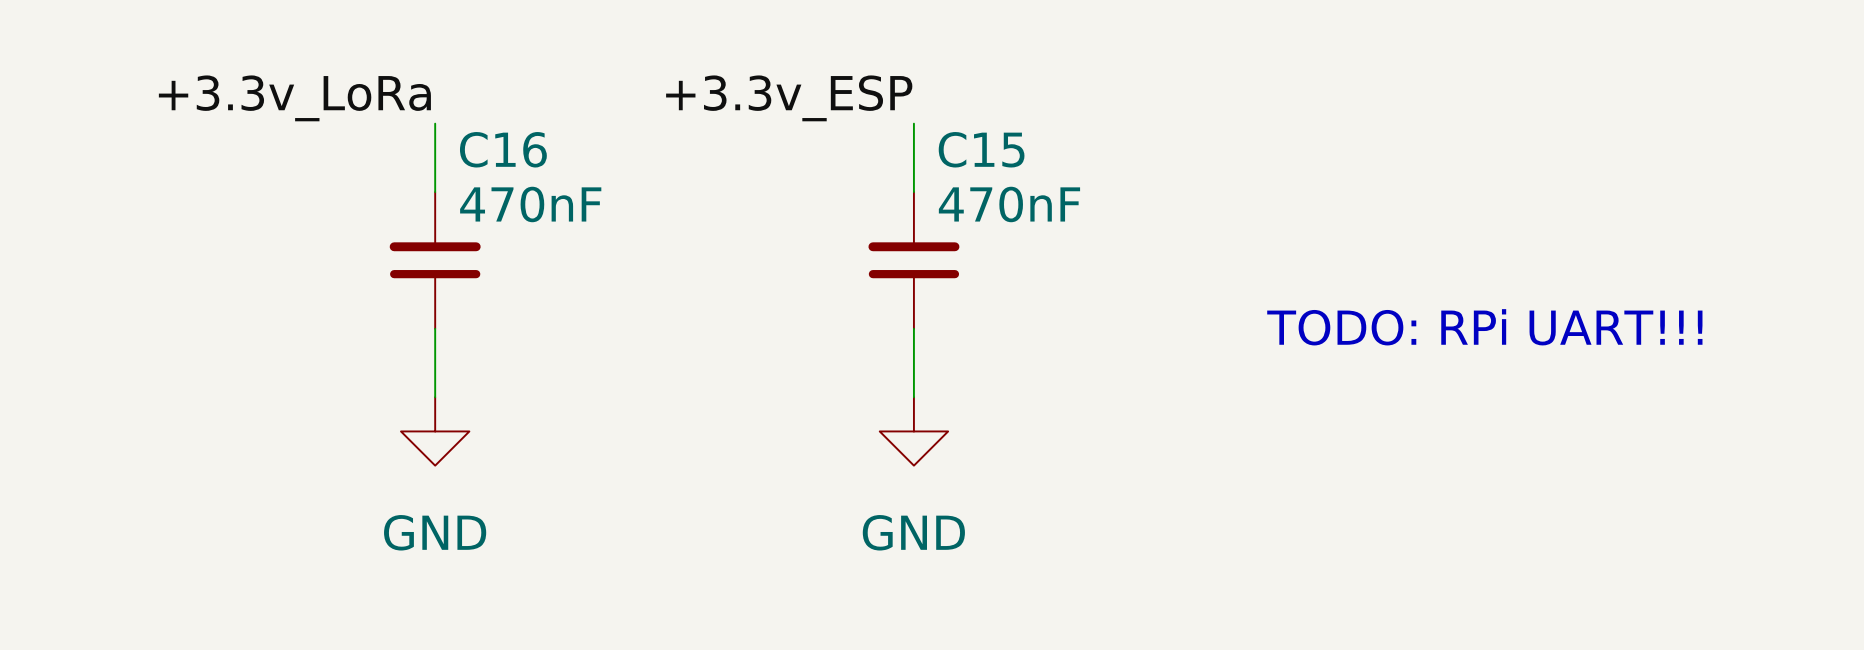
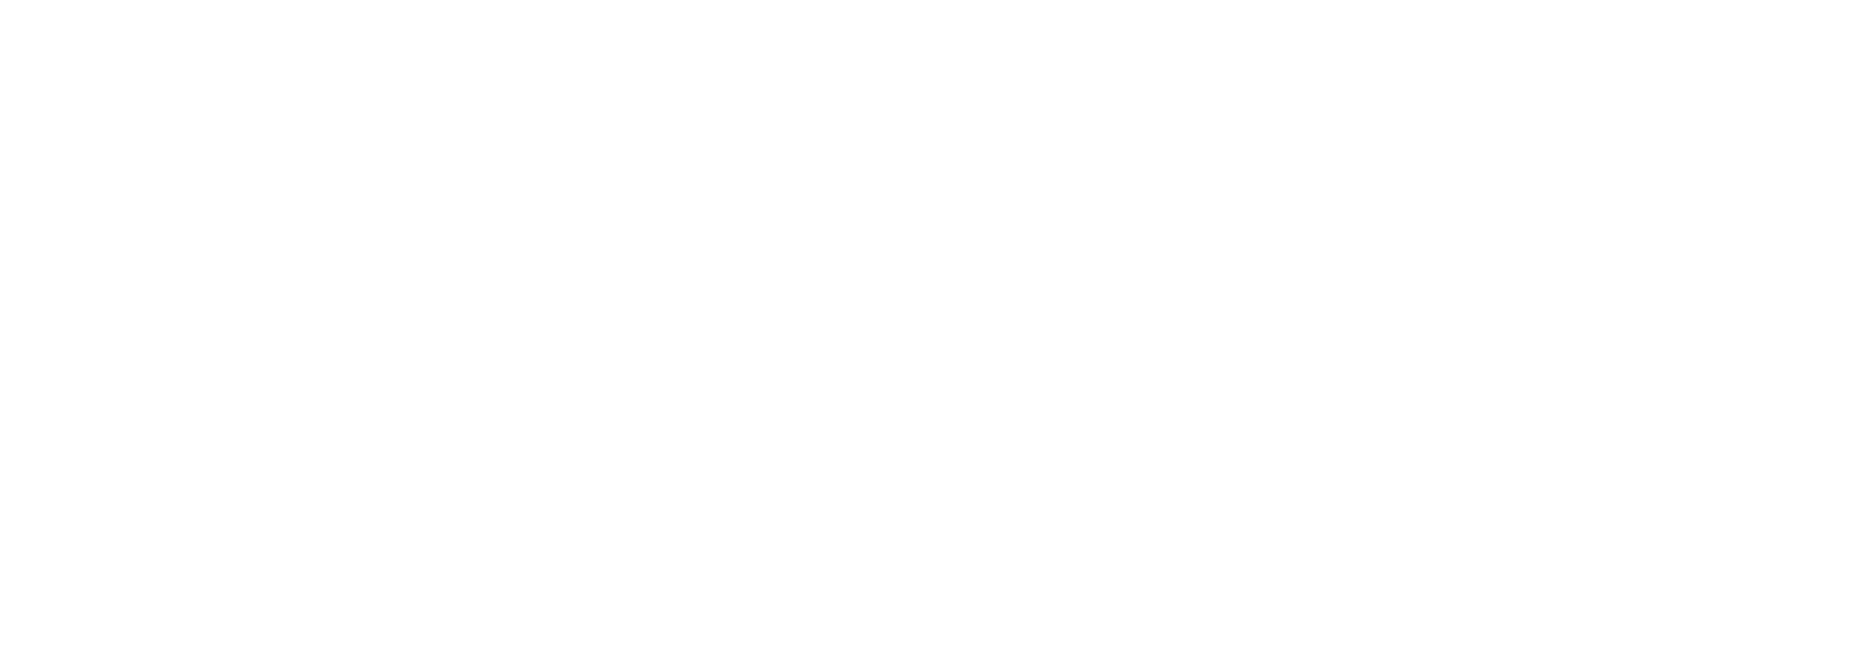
label: +3.3v_LoRa (294, 98) -> none
label: +3.3v_ESP (789, 98) -> none
wire: (435, 123) (435, 192) -> none
wire: (913, 123) (913, 192) -> none
C16: 470nF (435, 260) -> none
C15: 470nF (913, 260) -> none
text: TODO: RPi UART!!! (1484, 327) -> none
wire: (435, 328) (435, 397) -> none
wire: (913, 328) (913, 397) -> none
power symbol: GND (435, 431) -> none
power symbol: GND (913, 431) -> none

